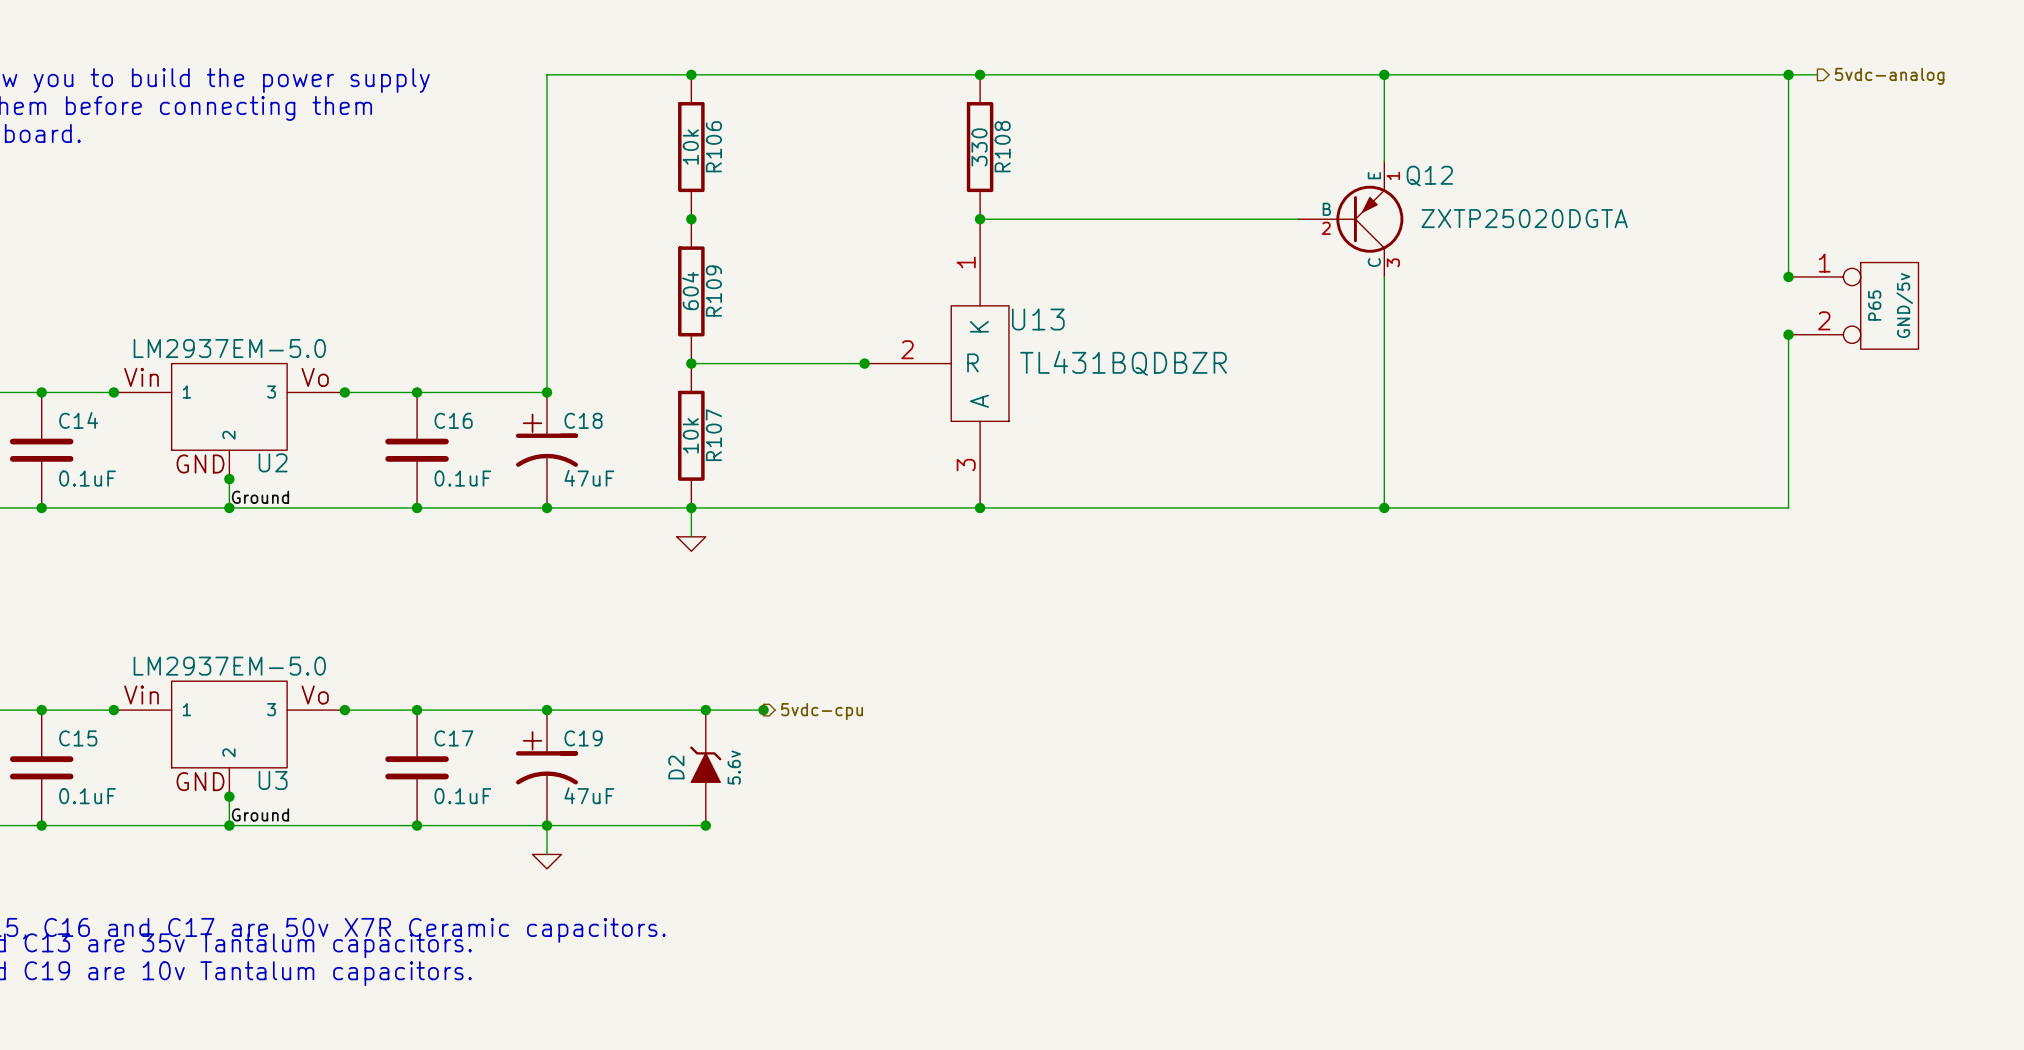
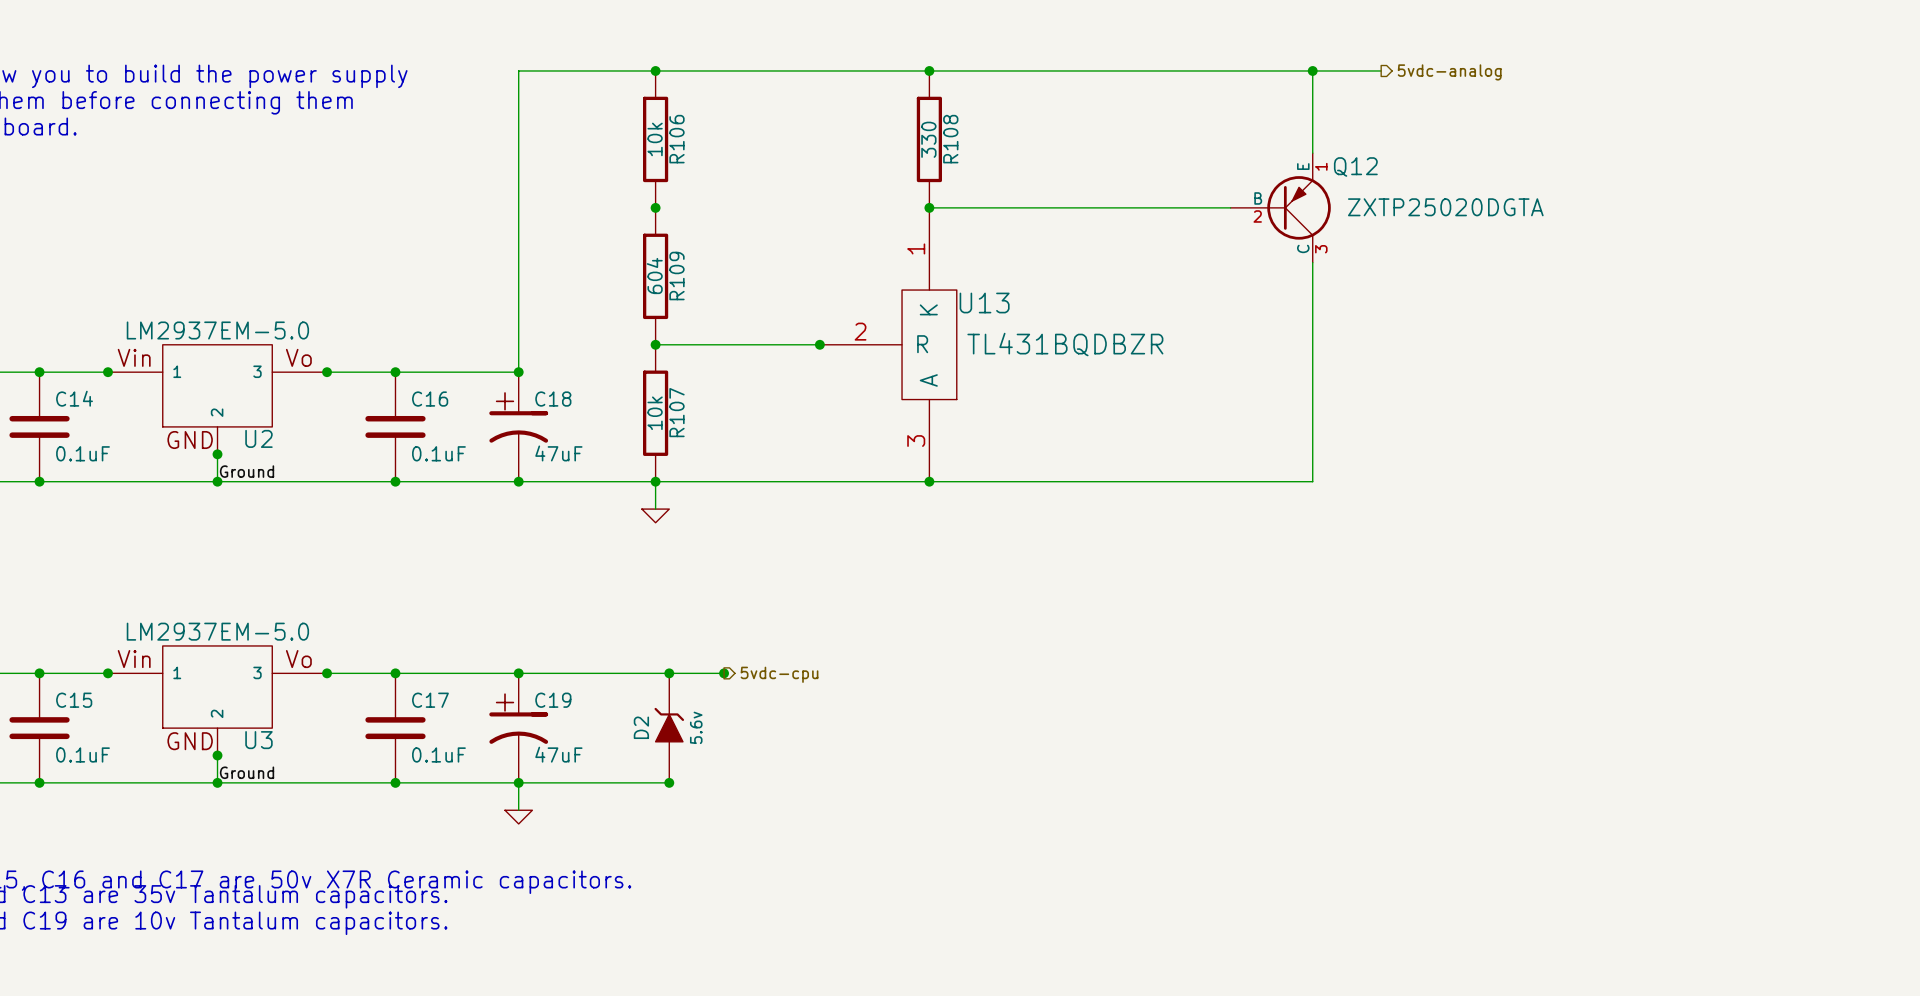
wire: (1456, 74) (1817, 74) -> none
wire: (1788, 74) (1788, 276) -> none
junction: (1788, 74) -> none
hierarchical label: none -> 5vdc-analog (1449, 72)
hierarchical label: 5vdc-analog (1889, 76) -> none
junction: (1788, 276) -> none
P65: GND/5v (1853, 305) -> none
wire: (1788, 334) (1788, 507) (1384, 507) -> none
junction: (1788, 334) -> none
junction: (1384, 507) -> none

